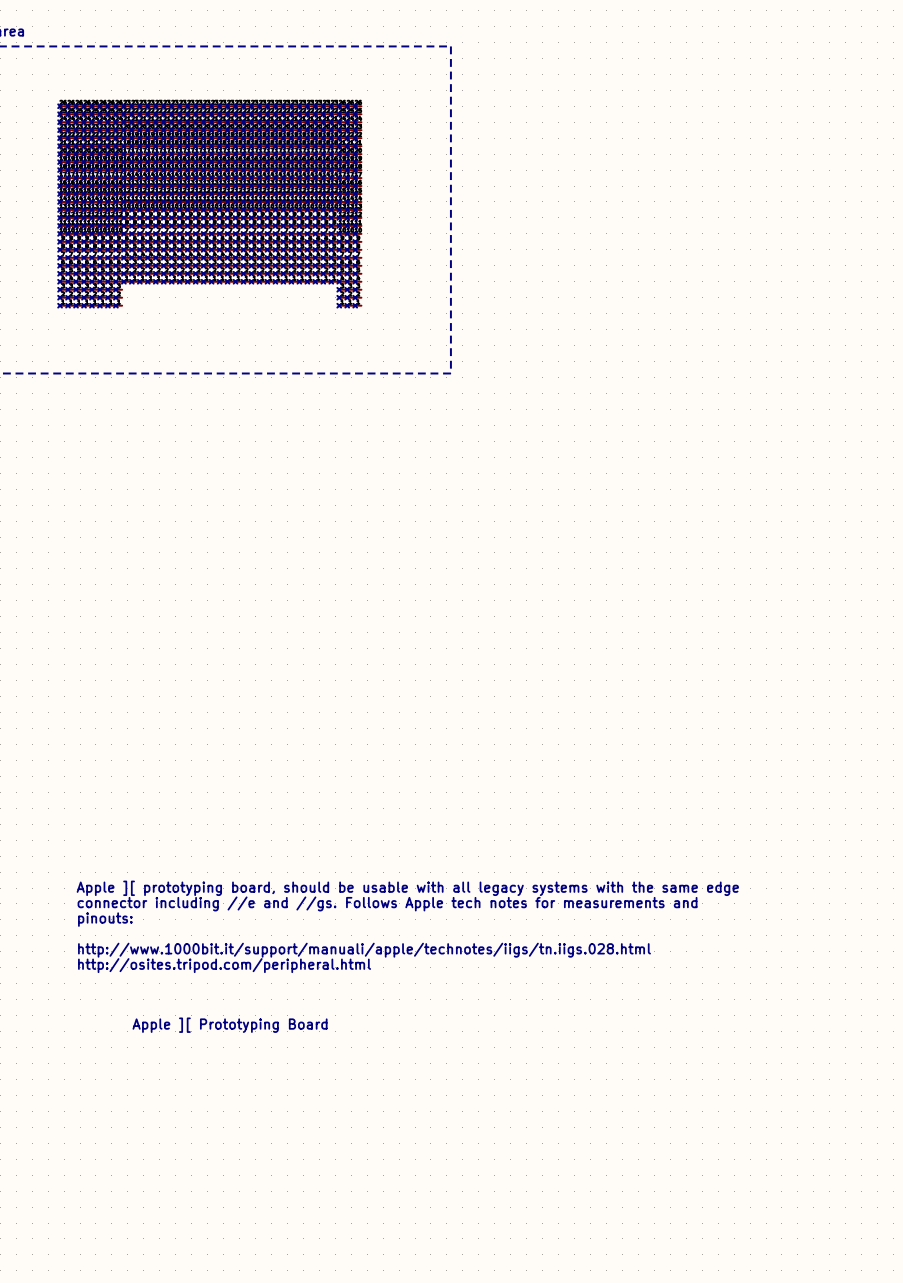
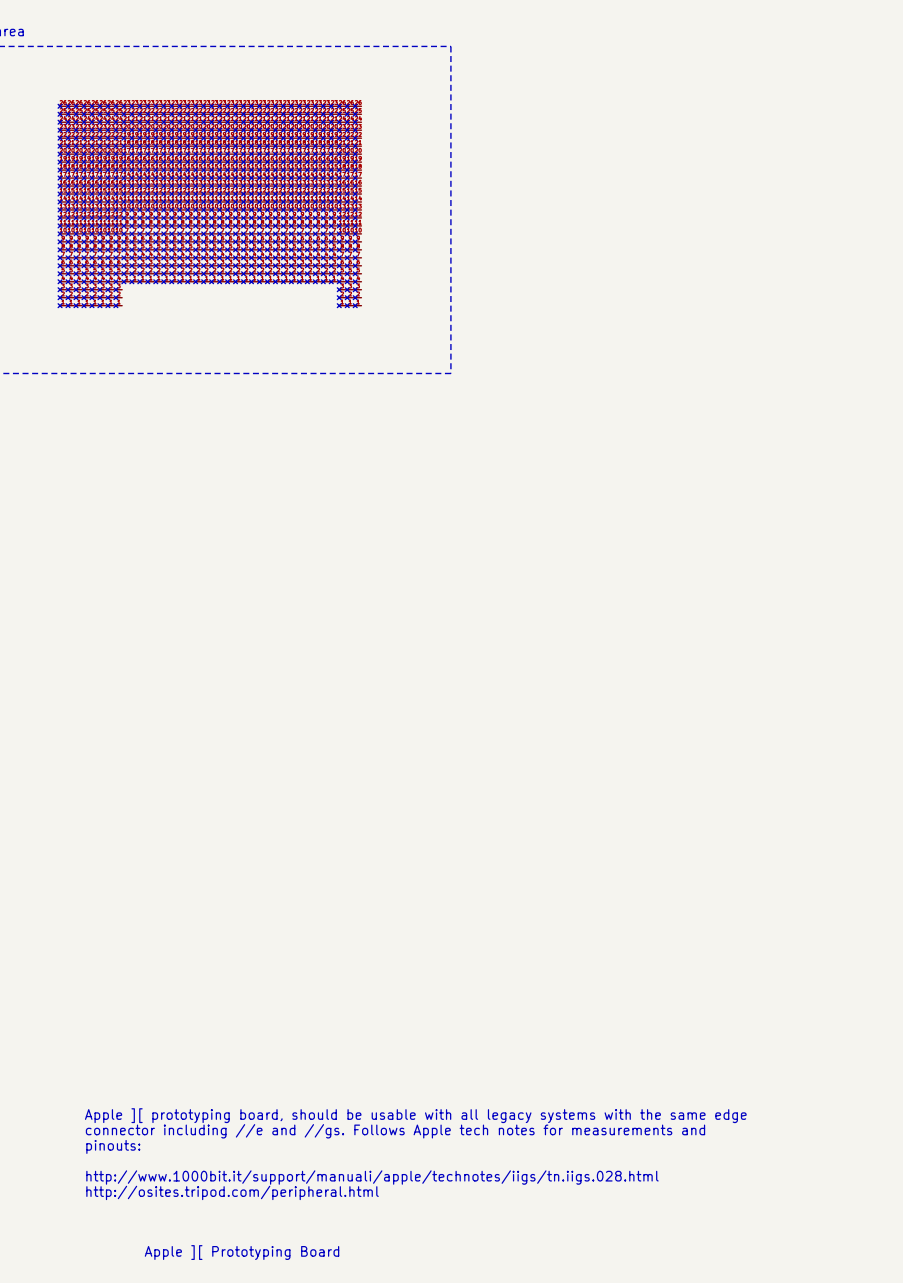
text: Apple ][ prototyping board, should be usable with all legacy systems with the same edge (407, 888) -> none
text: connector including //e and //gs. Follows Apple tech notes for measurements and (387, 903) -> none
text: pinouts: (105, 919) -> none
text: http://www.1000bit.it/support/manuali/apple/technotes/iigs/tn.iigs.028.html (364, 950) -> none
text: http://osites.tripod.com/peripheral.html (224, 965) -> none
text: Apple ][ Prototyping Board (230, 1025) -> none
text: none -> Apple ][ prototyping board, should be usable with all legacy systems with the same edge (415, 1115)
text: none -> connector including //e and //gs. Follows Apple tech notes for measurements and (395, 1131)
text: none -> pinouts: (113, 1146)
text: none -> http://www.1000bit.it/support/manuali/apple/technotes/iigs/tn.iigs.028.html (372, 1177)
text: none -> http://osites.tripod.com/peripheral.html (232, 1192)
text: none -> Apple ][ Prototyping Board (241, 1252)

